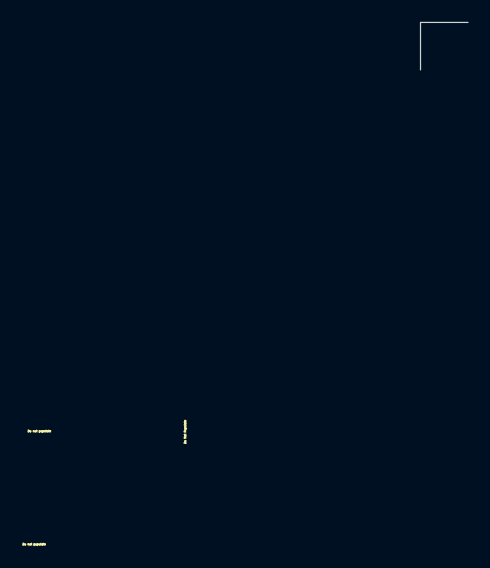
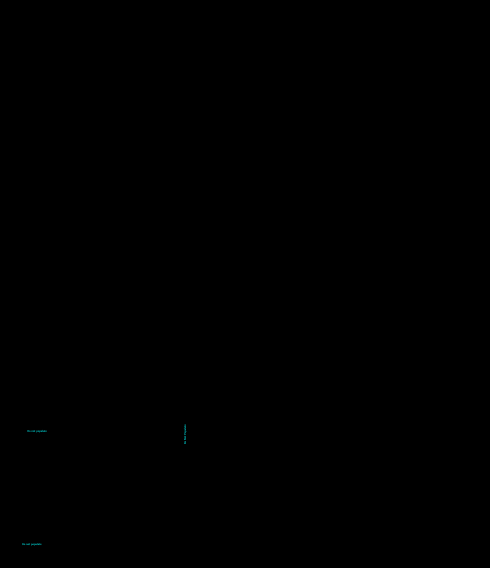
board edge: (468, 22) (420, 22) (420, 69) -> none

